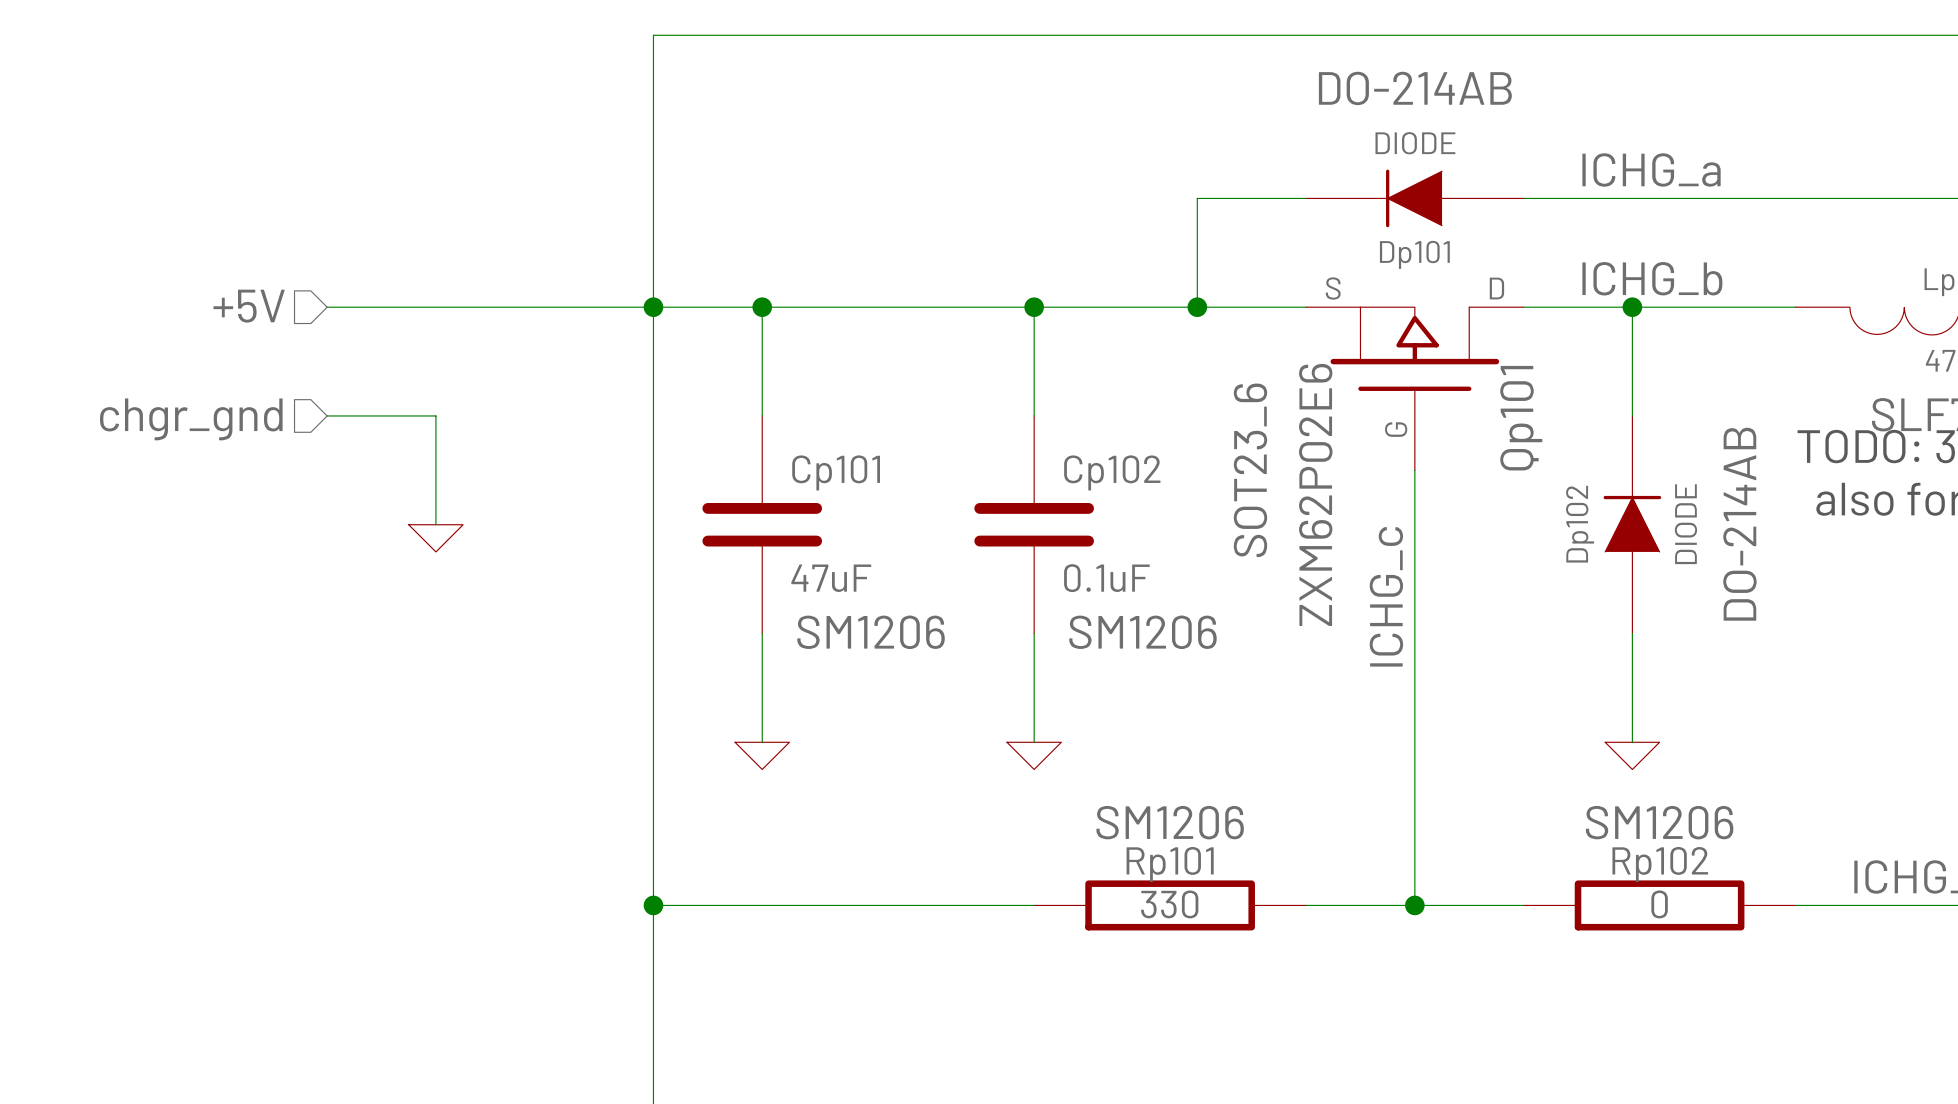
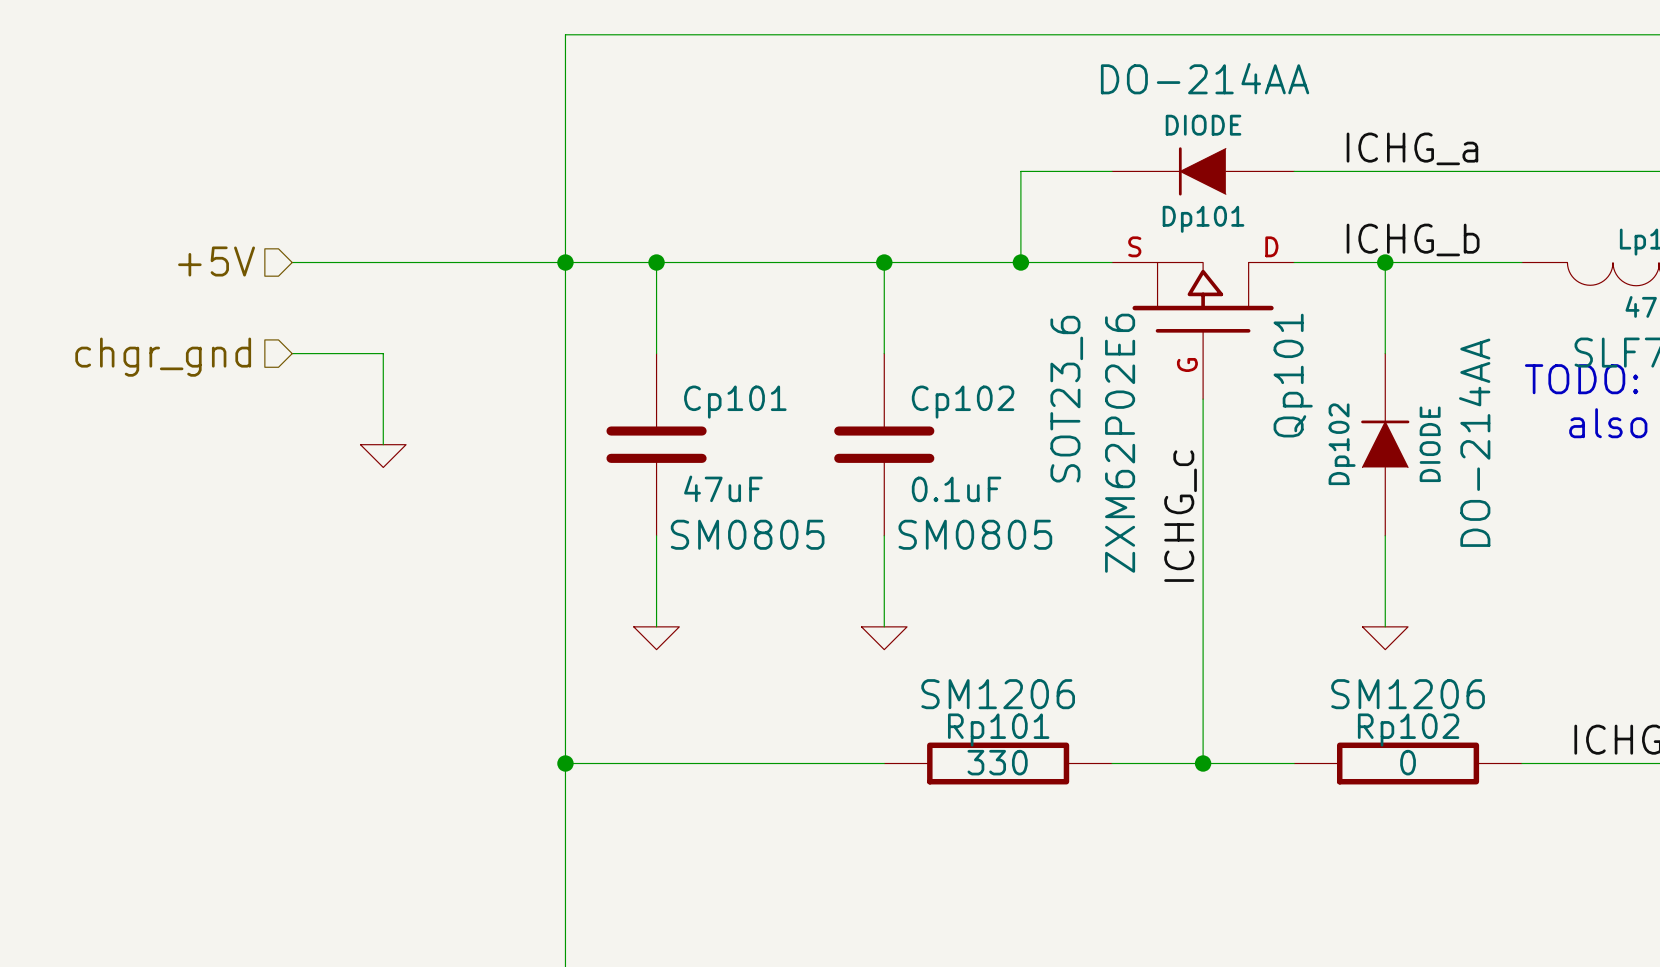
Dp101 text: DO-214AB (1415, 88) -> DO-214AA (1205, 78)
Dp102 text: DO-214AB (1739, 524) -> DO-214AA (1474, 442)
Cp101 text: SM1206 (871, 632) -> SM0805 (747, 534)
Cp102 text: SM1206 (1142, 632) -> SM0805 (975, 534)

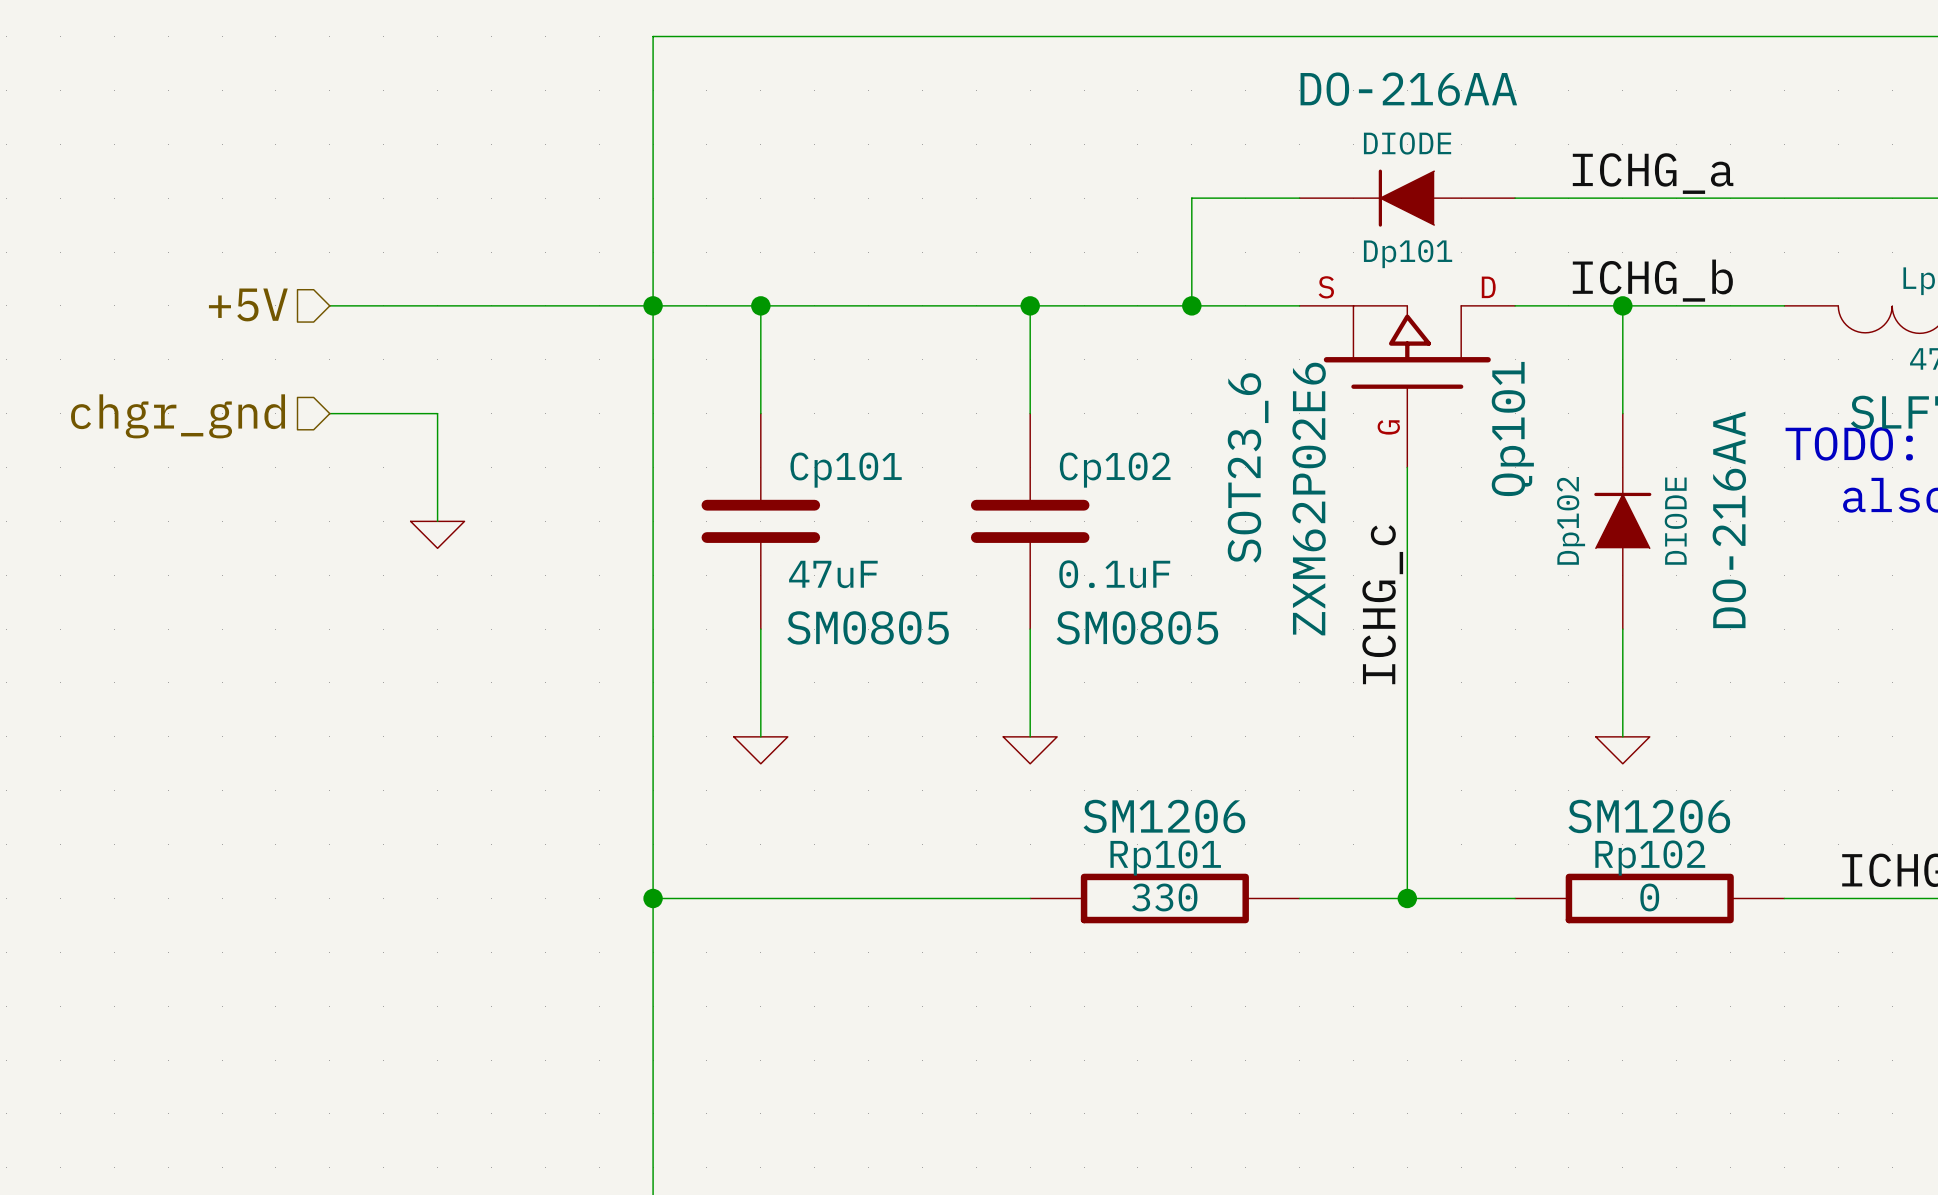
Dp101 text: DO-214AA (1205, 78) -> DO-216AA (1408, 89)
Dp102 text: DO-214AA (1474, 442) -> DO-216AA (1729, 519)

